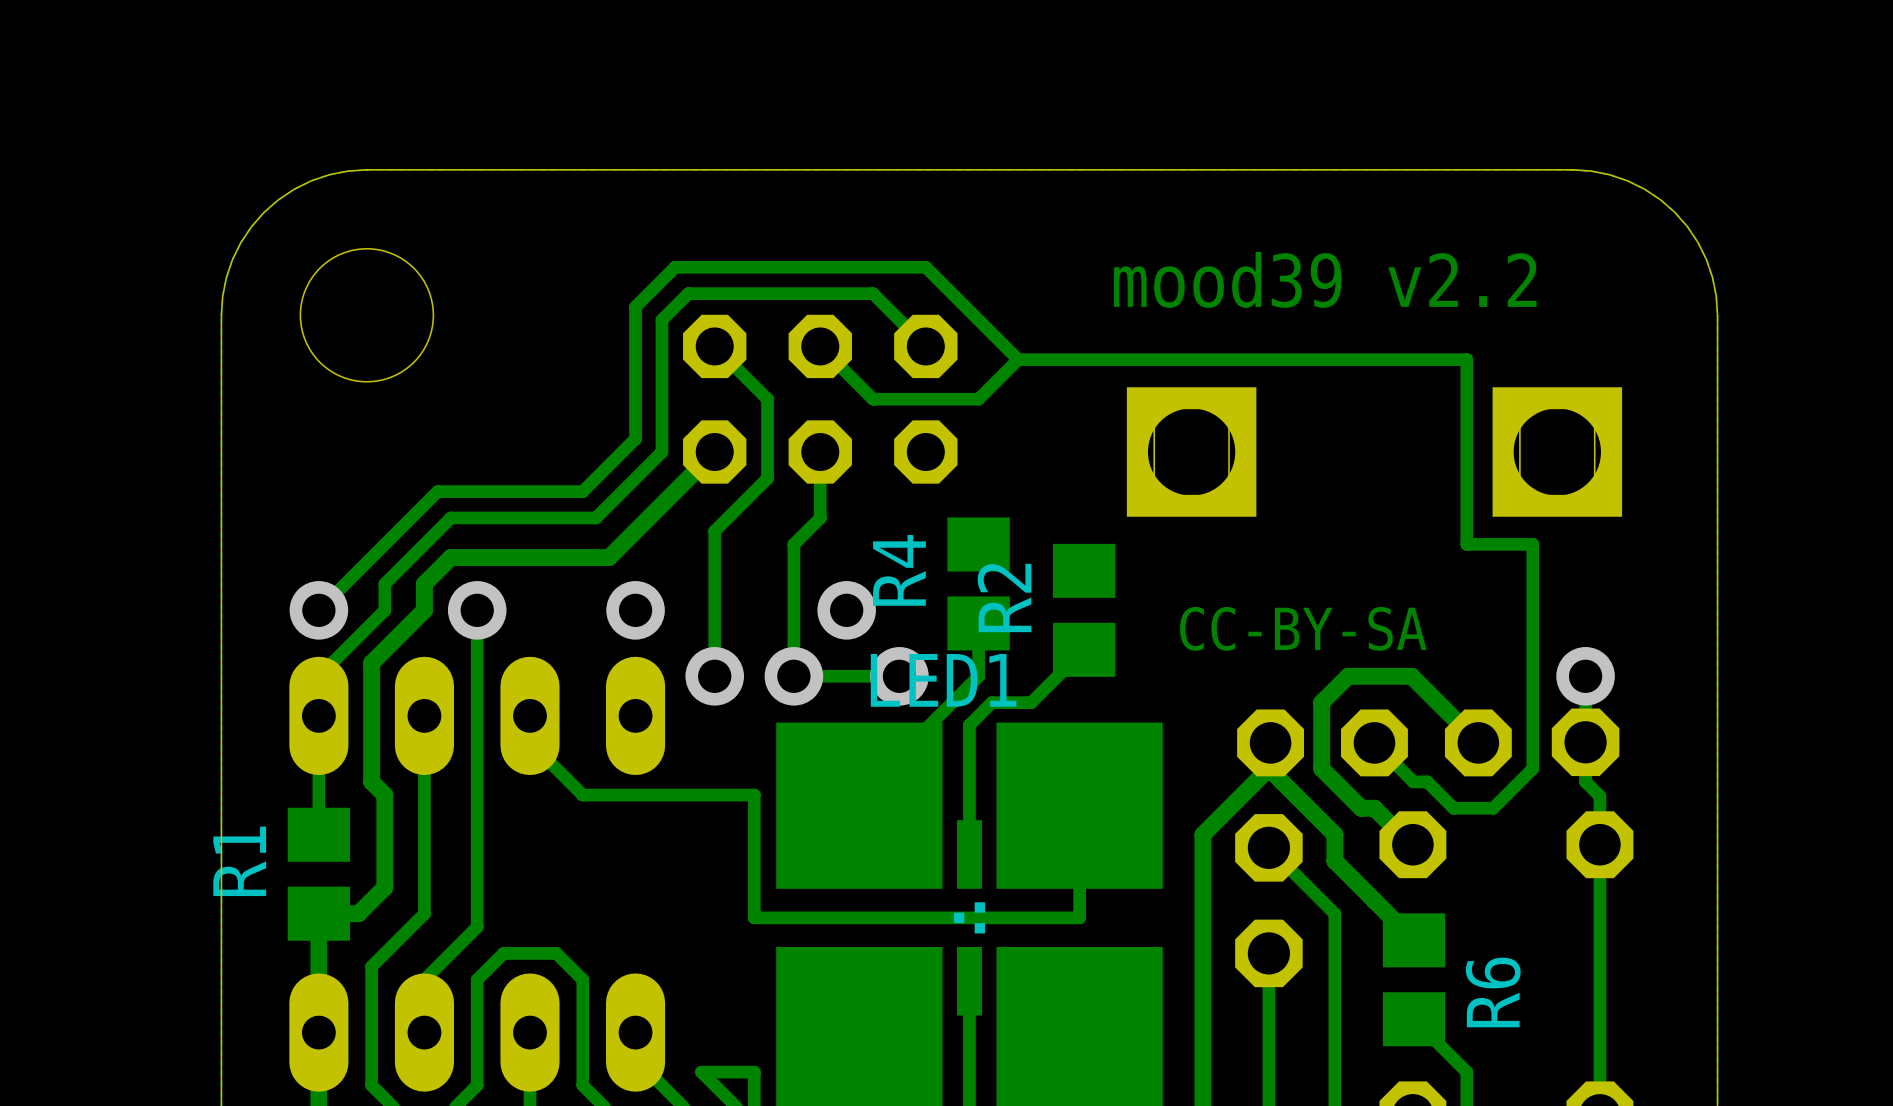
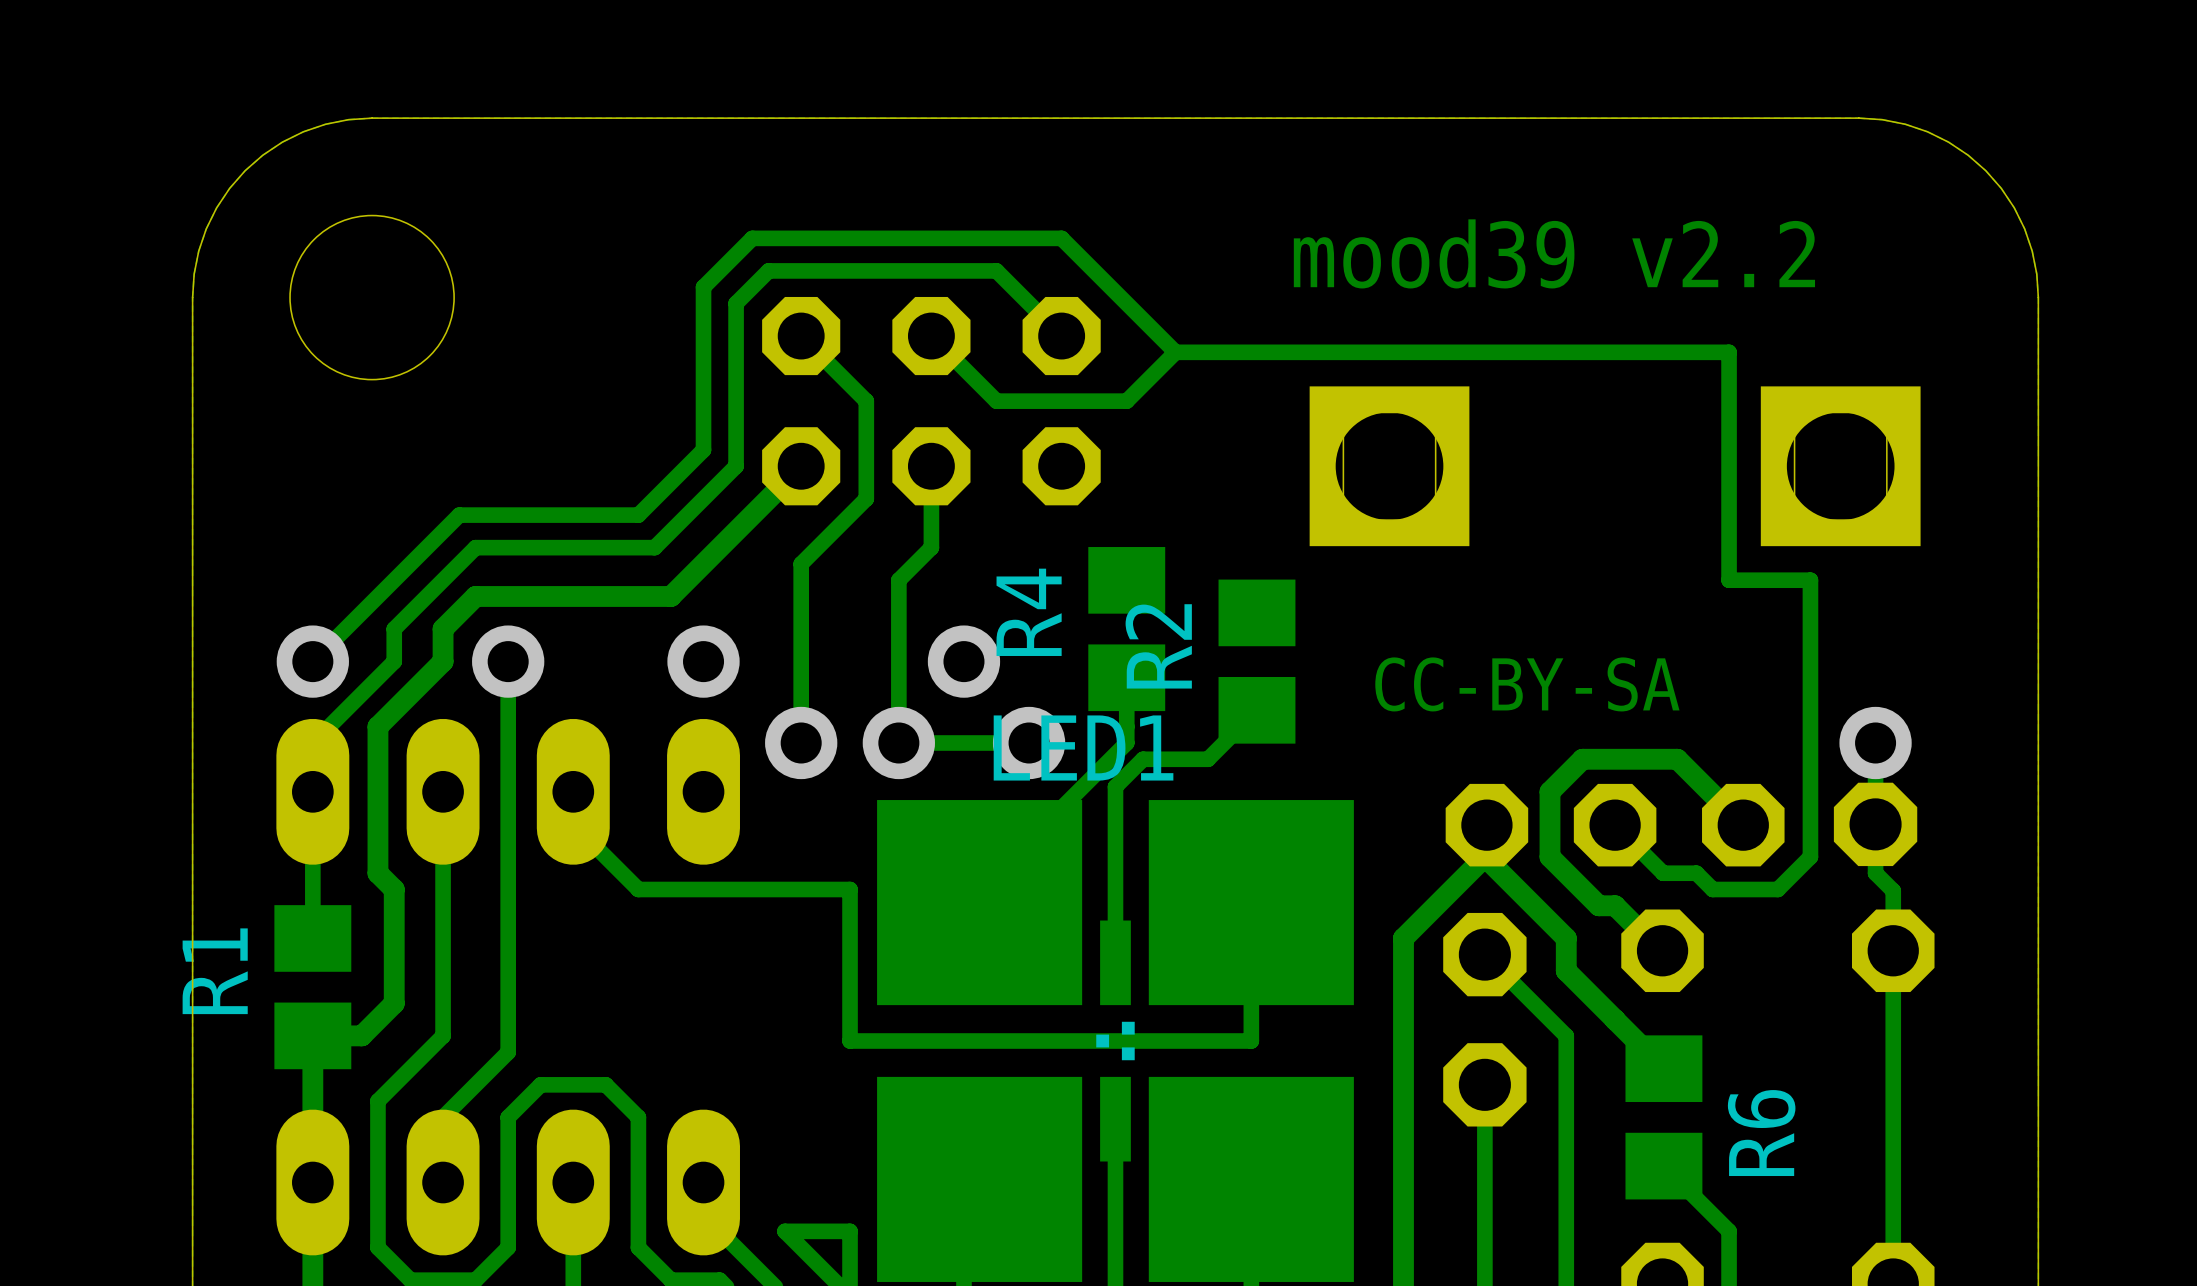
track: (1044, 689) (1031, 702) (991, 702) (969, 725) -> (1208, 759) (1143, 759) (1115, 786) (1115, 803)
track: (1424, 689) (1411, 676) (1348, 676) (1321, 702) (1321, 715) -> (1677, 759) (1582, 759) (1549, 791)
track: (1427, 781) (1453, 808) (1493, 808) (1506, 795) -> (1680, 873) (1696, 873) (1712, 889) (1777, 889)

